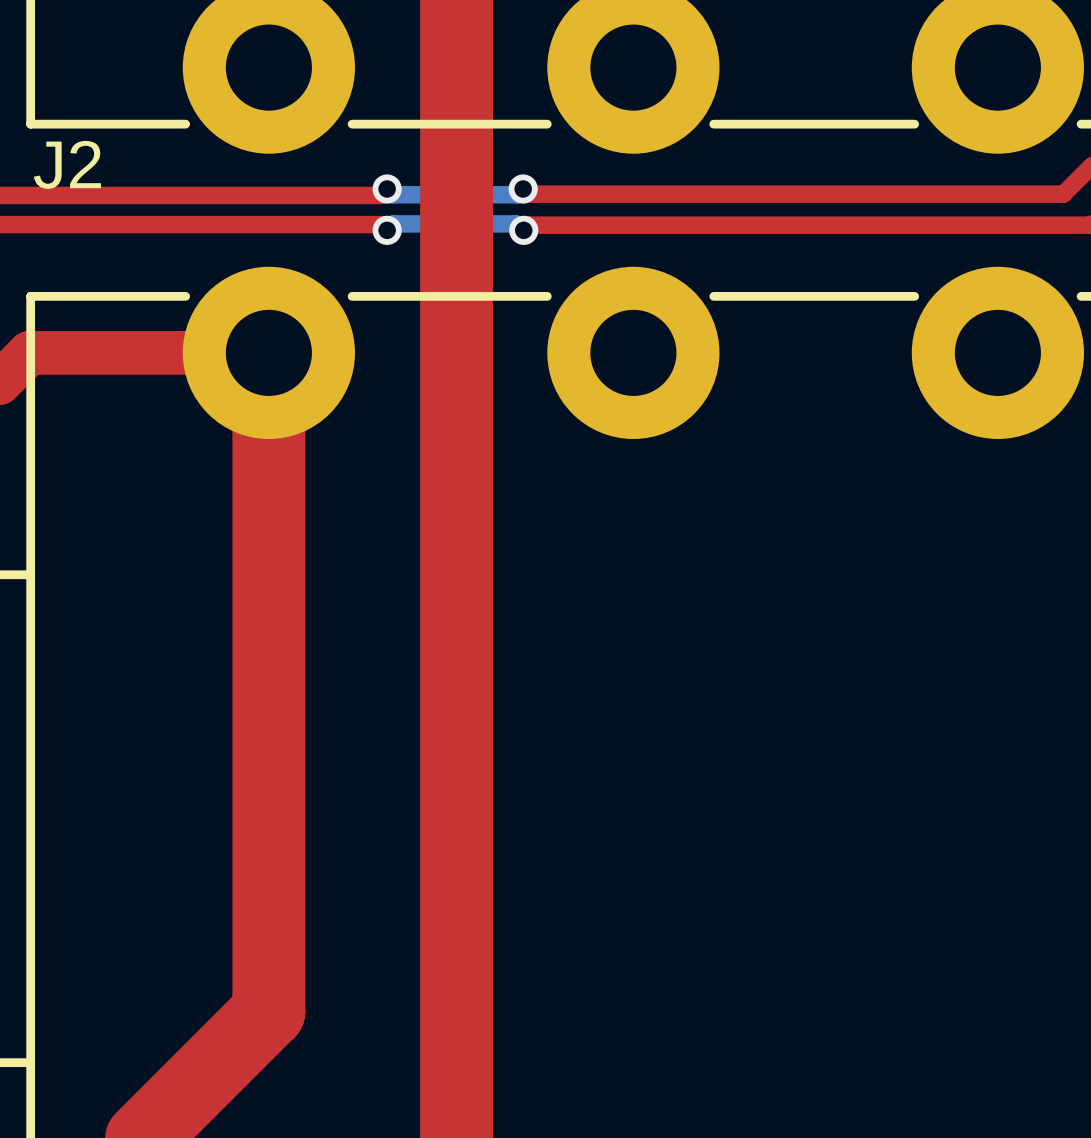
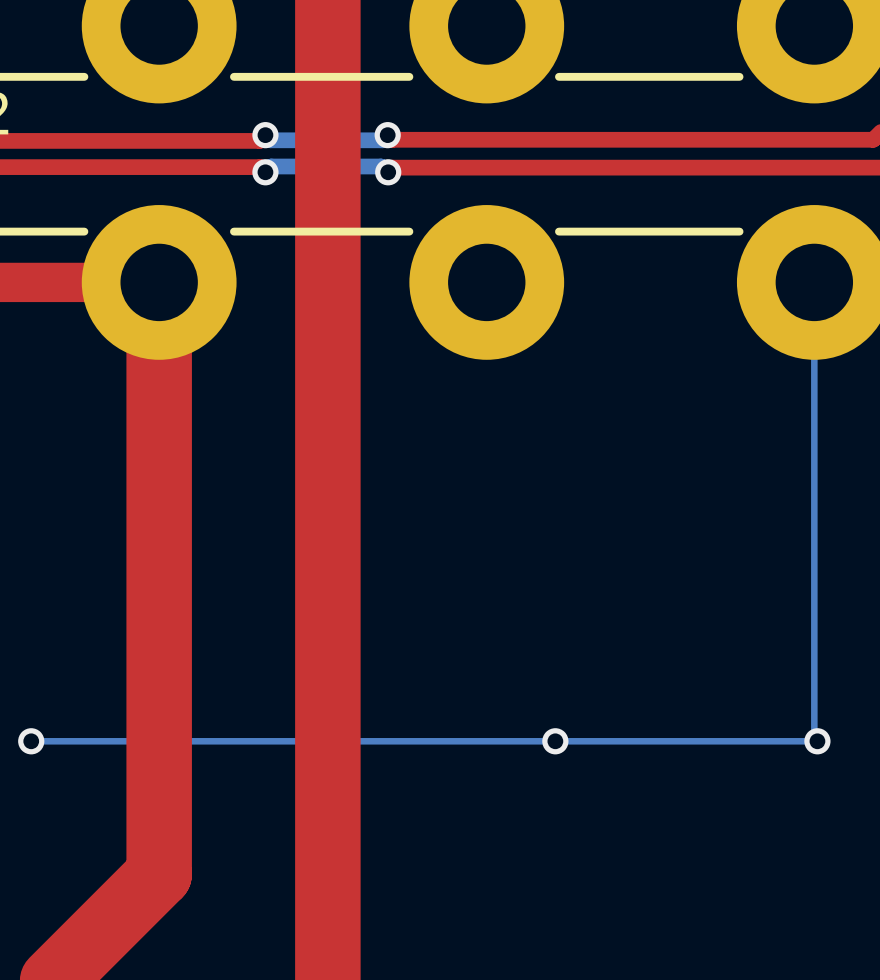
bottom track: none -> (814, 282) (814, 738) (817, 741) (31, 741)
via: none -> (31, 741)
via: none -> (555, 741)
via: none -> (817, 741)

